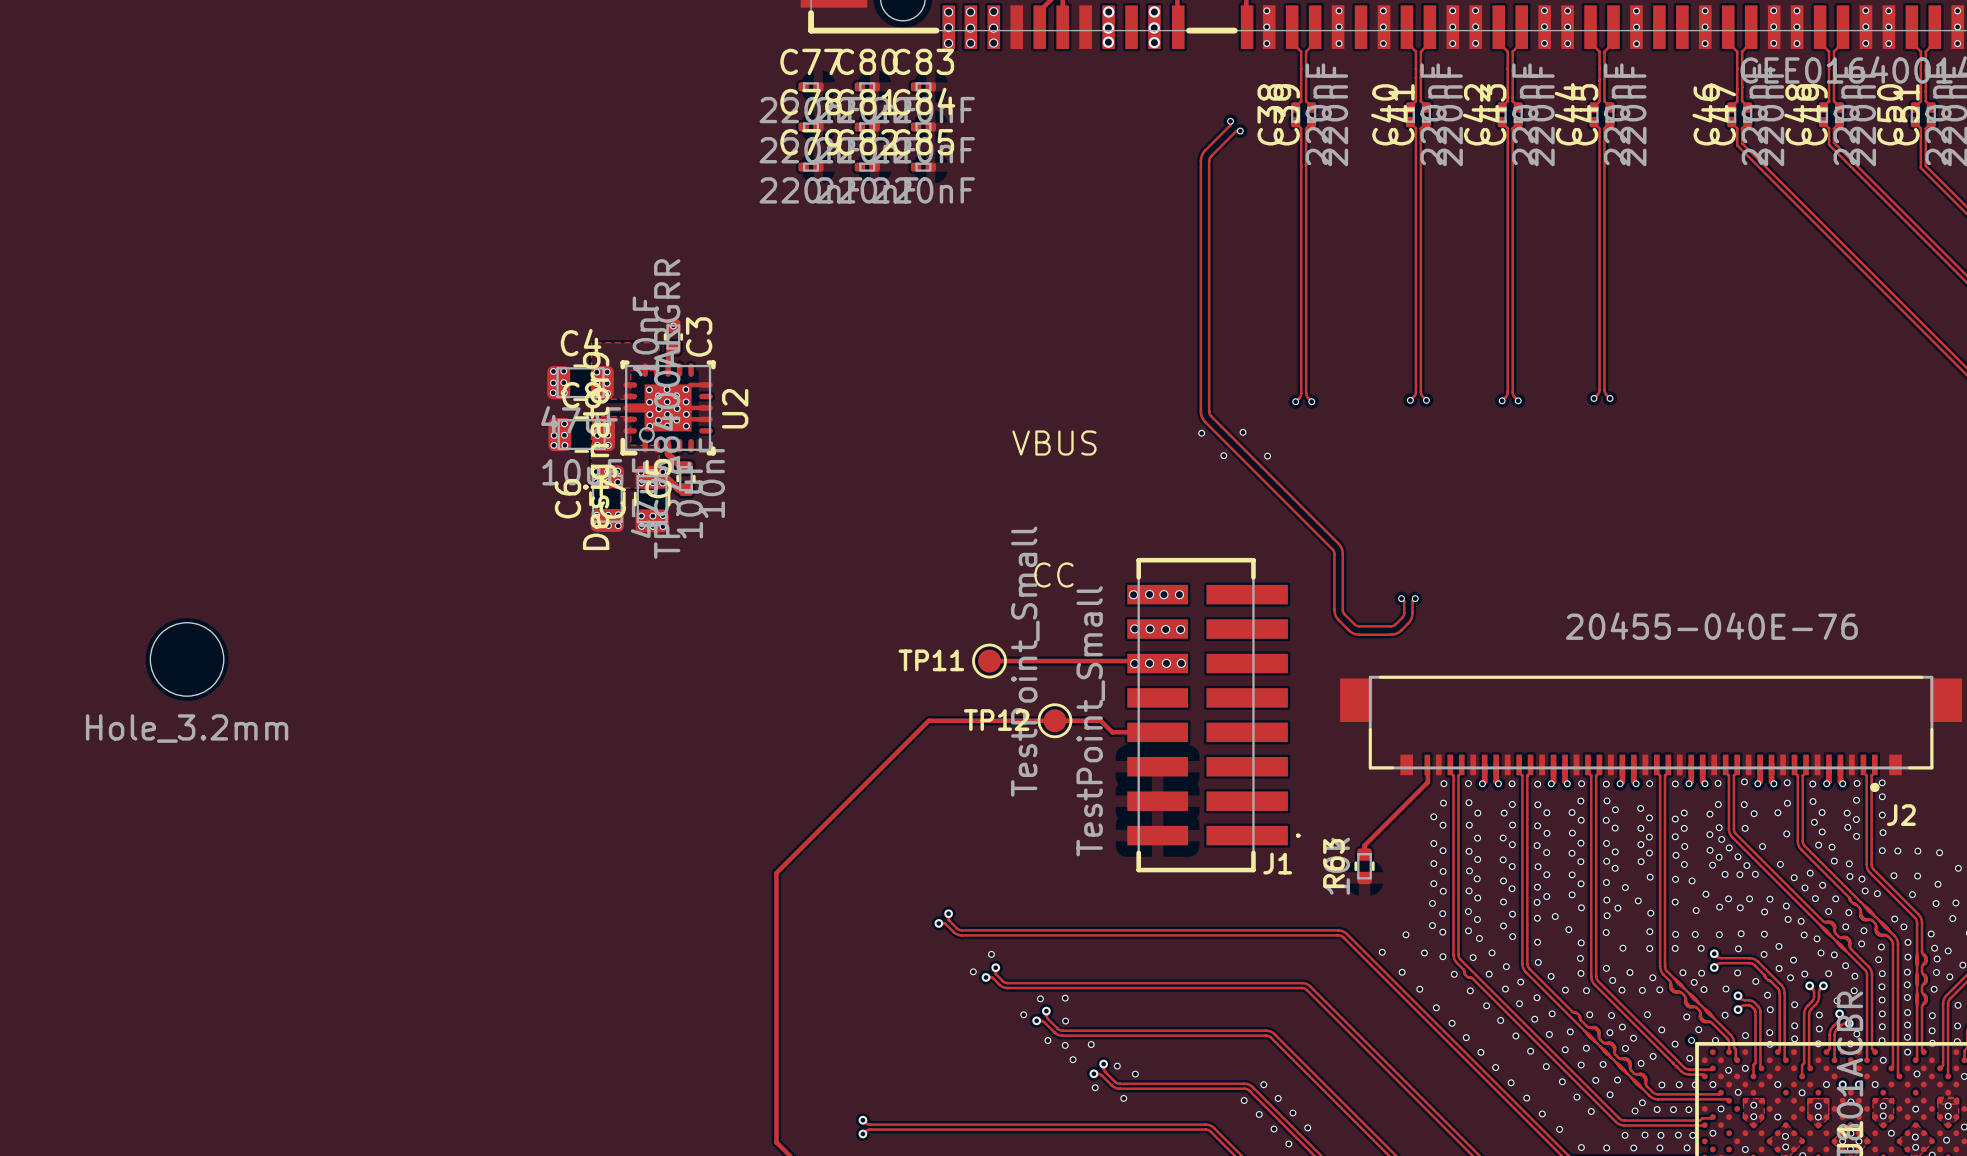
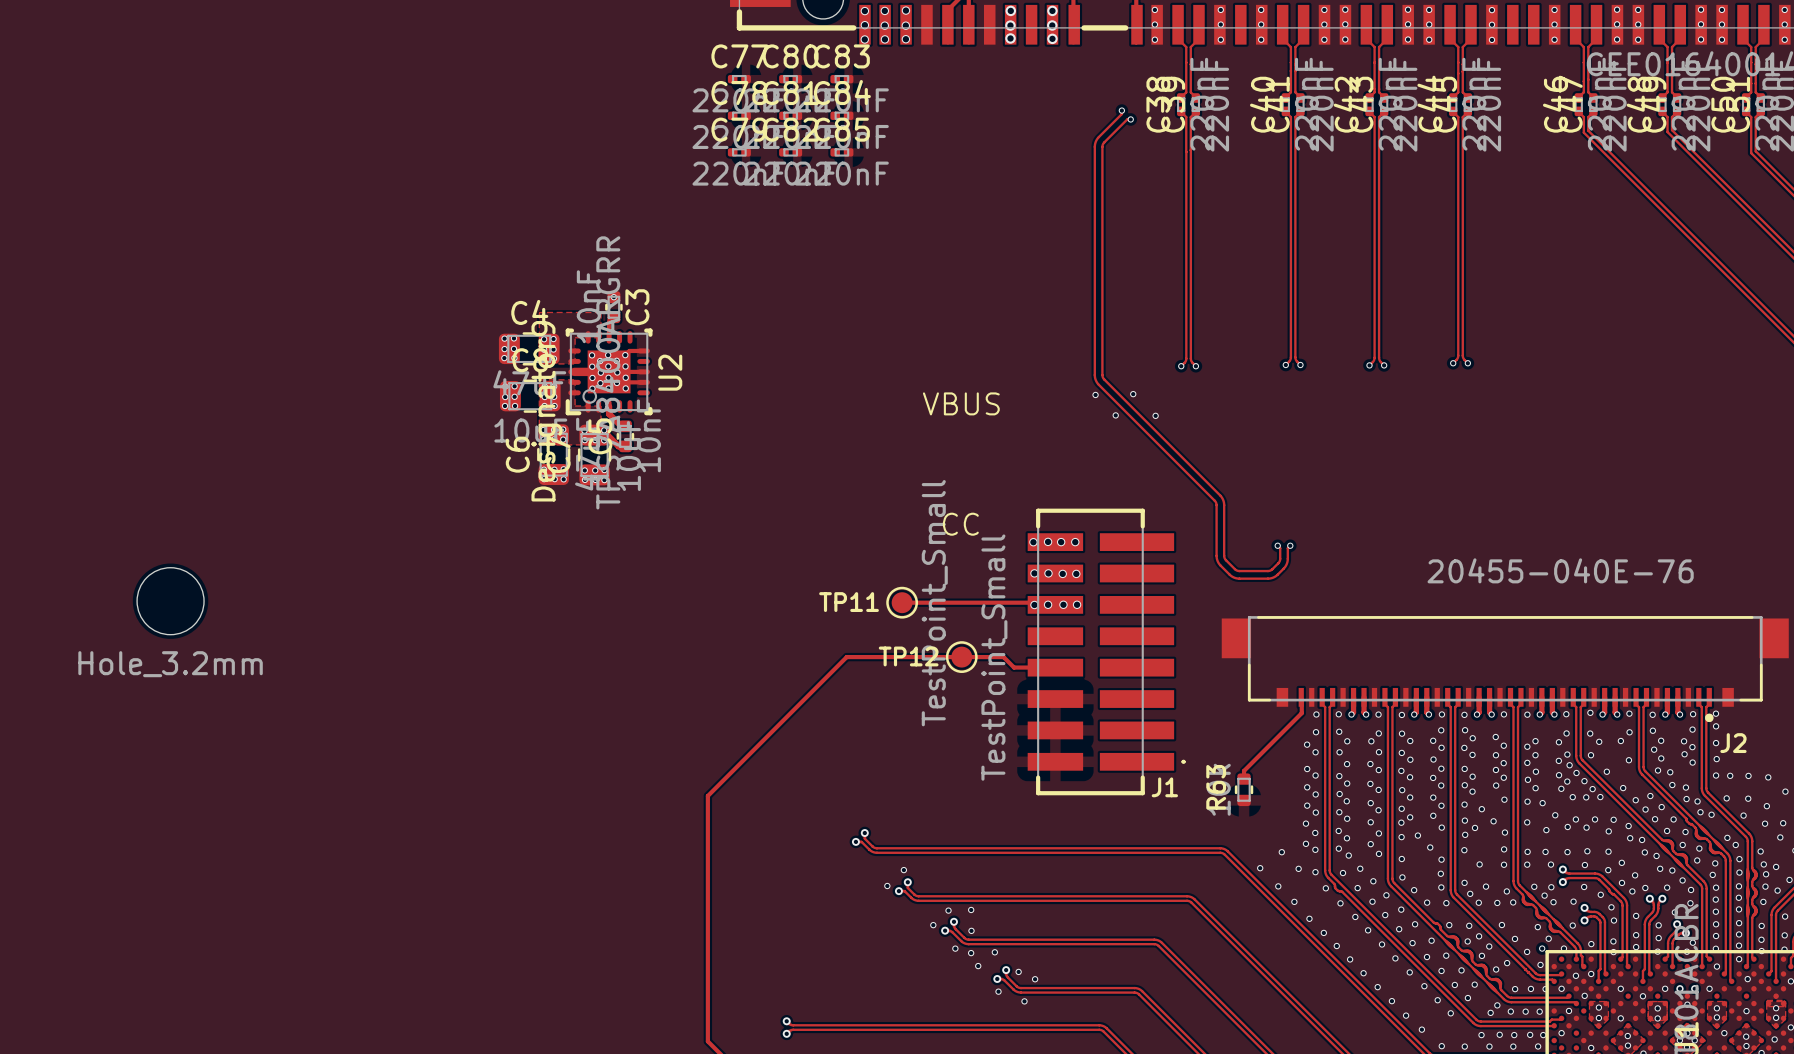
via: (1263, 1084) -> none
via: (1278, 1098) -> none
via: (1244, 1100) -> none
via: (1292, 1113) -> none
via: (1259, 1114) -> none
via: (1307, 1127) -> none
via: (1274, 1129) -> none
via: (1288, 1143) -> none

